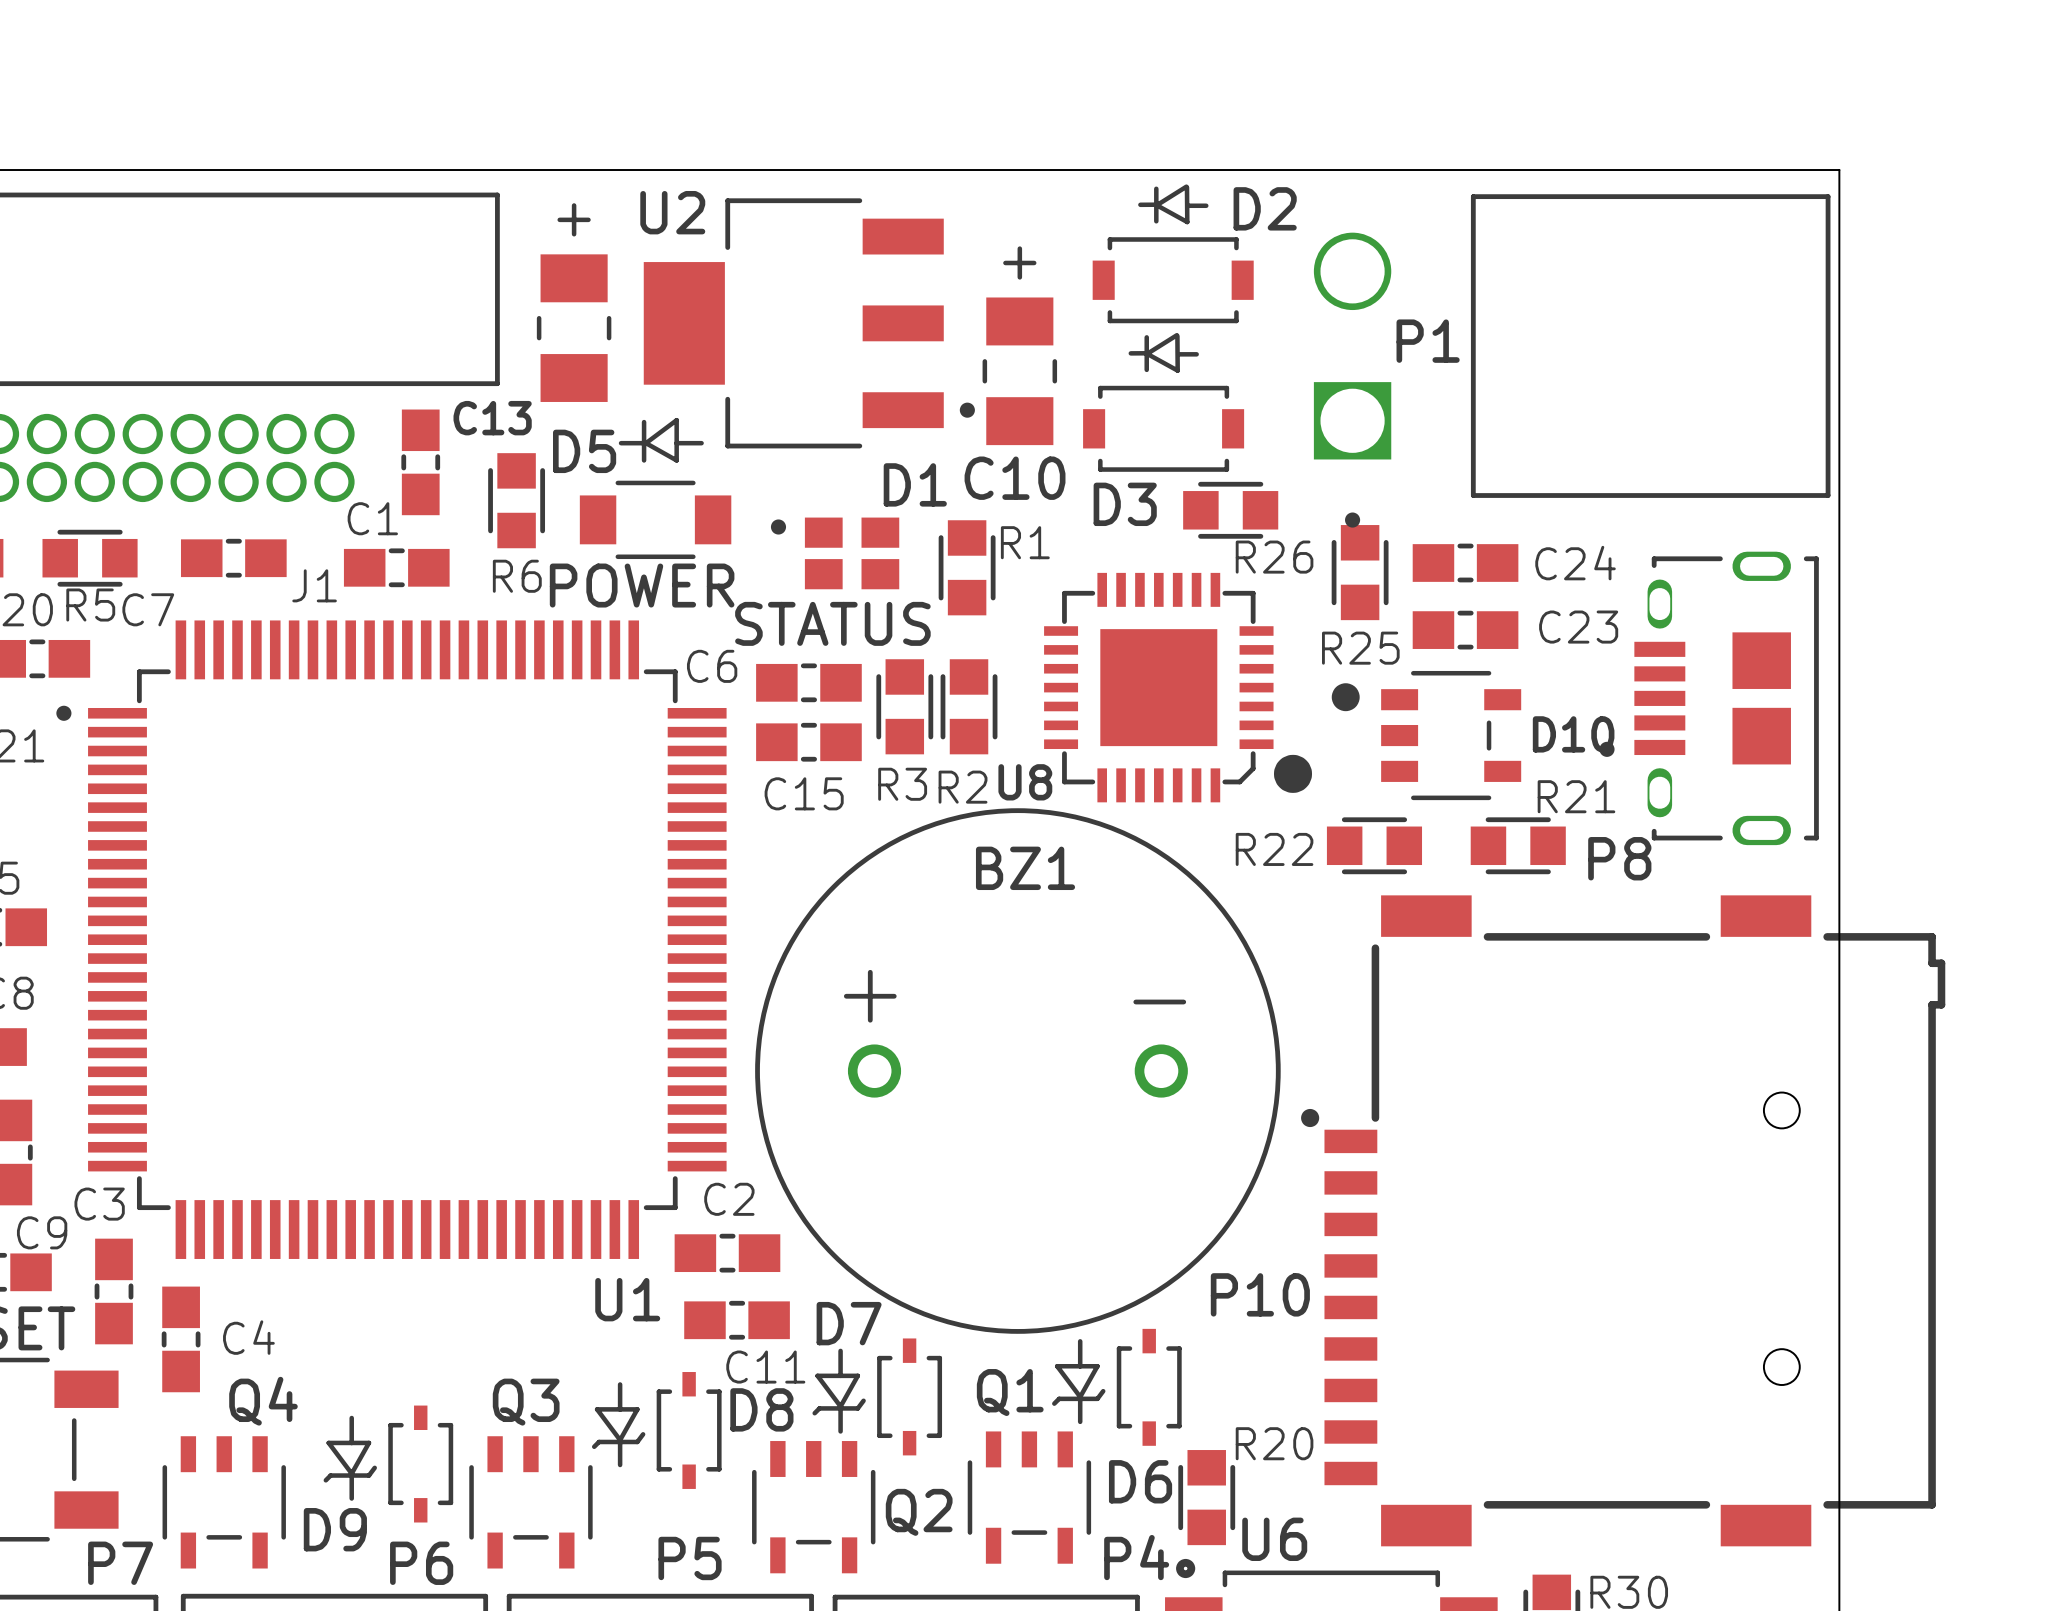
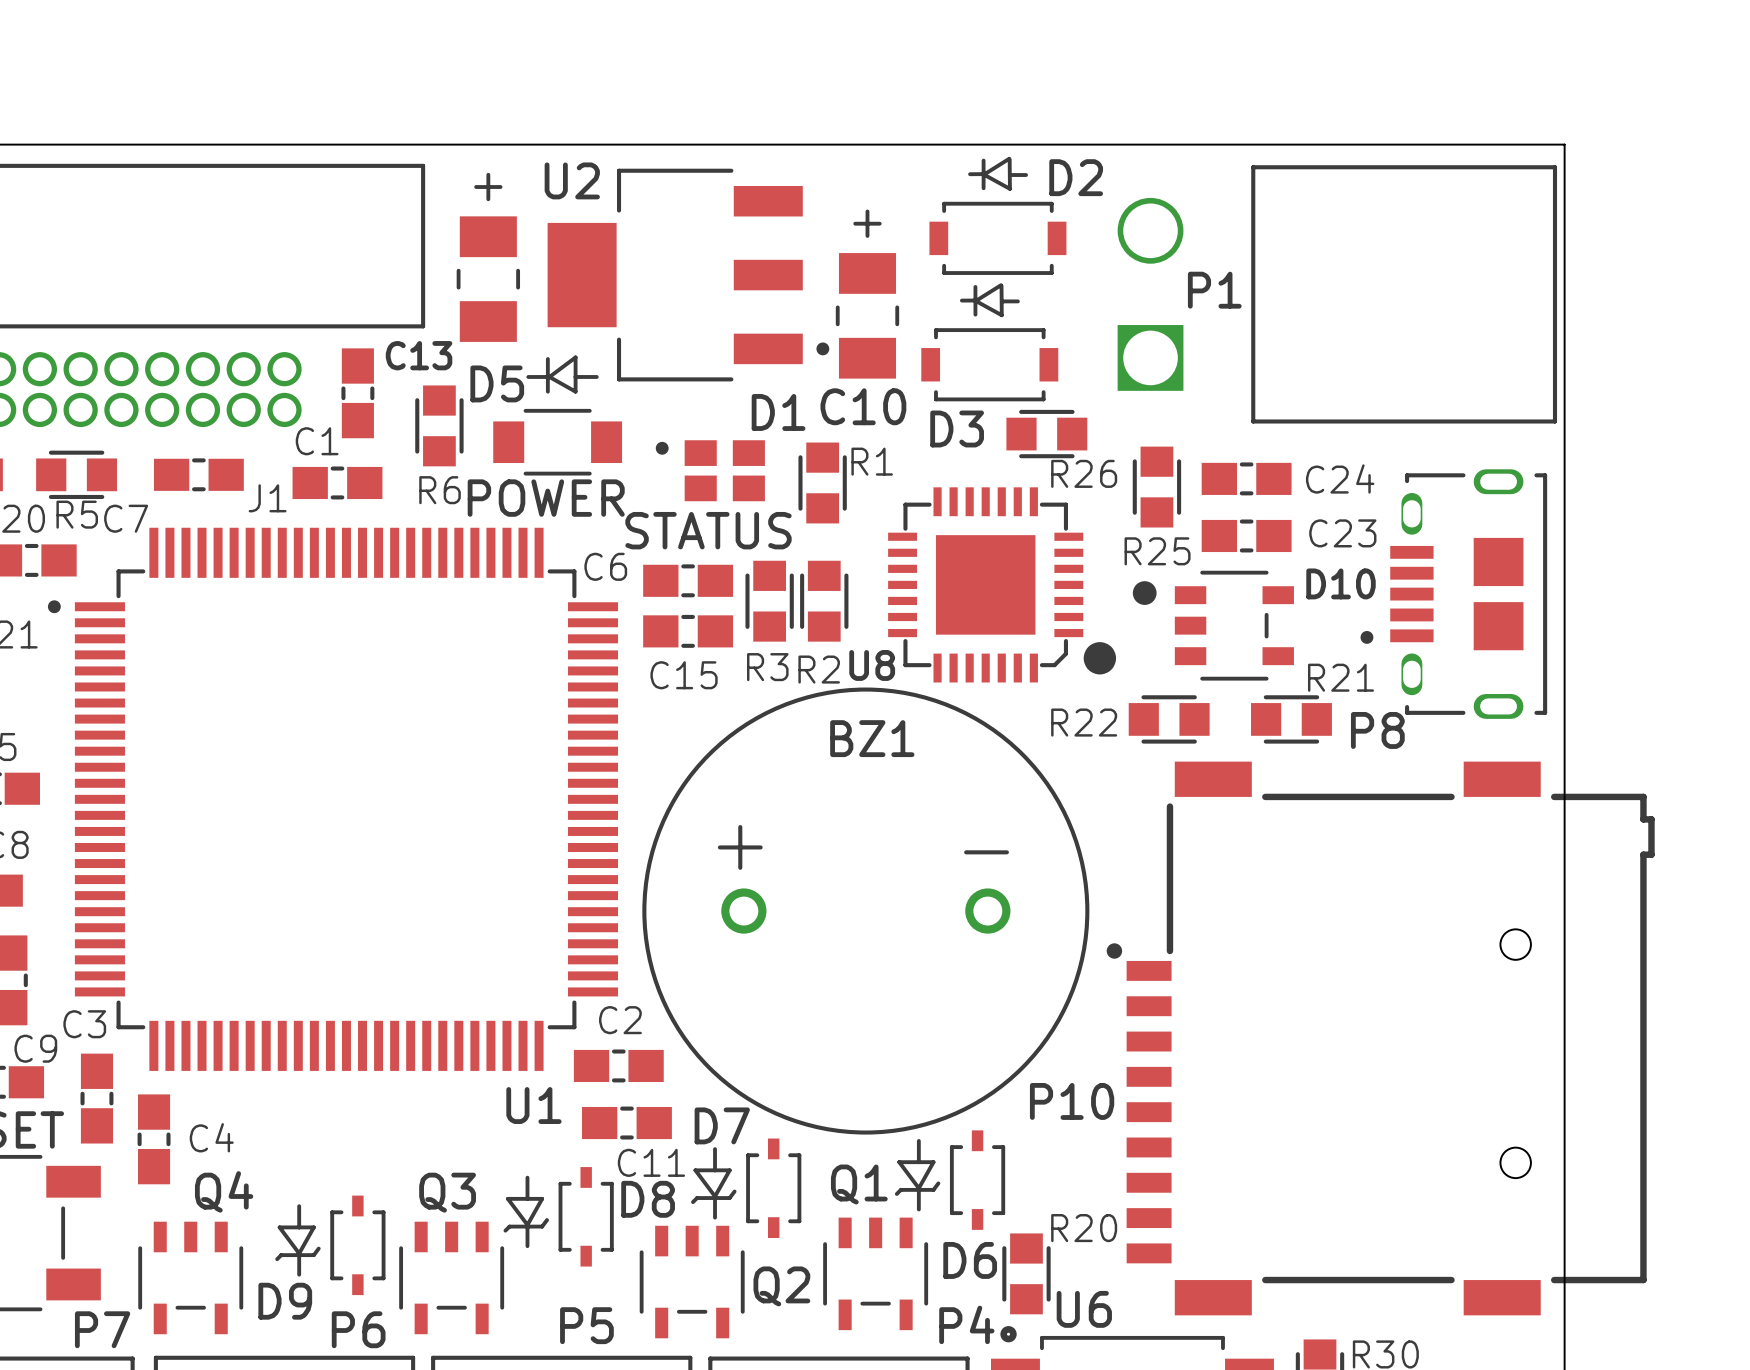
P1 footprint: [1313, 194, 1831, 528] -> [1117, 165, 1558, 424]
D10 name position: D10 (1573, 734) -> D10 (1341, 583)

